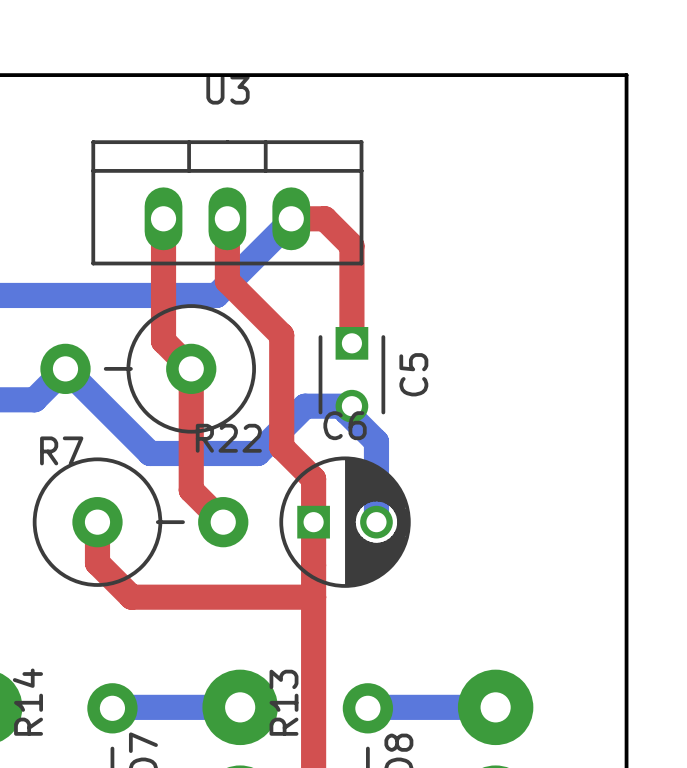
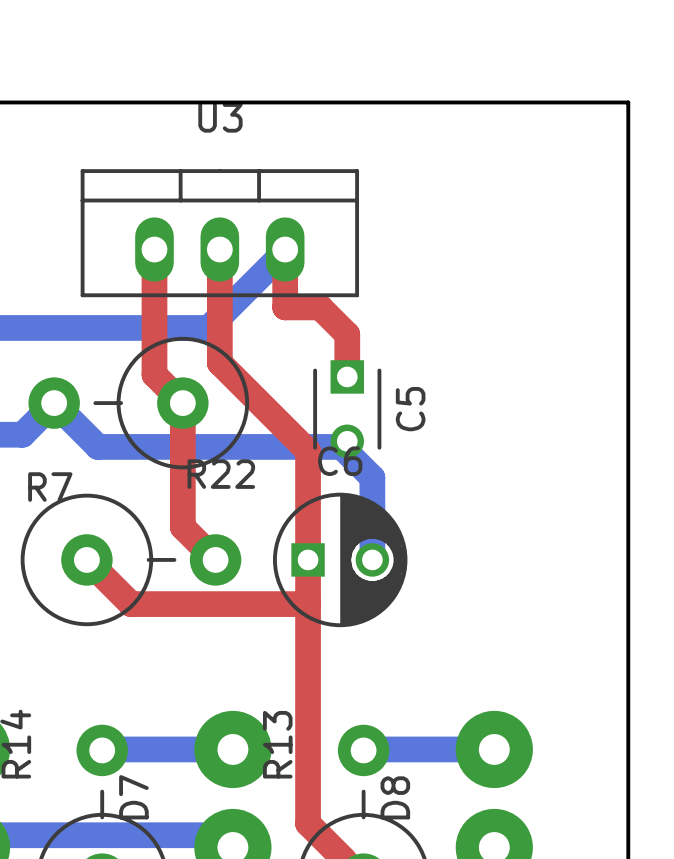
top track: (291, 218) (324, 218) (351, 245) (351, 301) -> (285, 249) (285, 307) (320, 307) (347, 334)
top track: (227, 281) (281, 335) (281, 447) (313, 479) -> (219, 313) (219, 362) (308, 451) (308, 515)
bottom track: (351, 406) (305, 406) (257, 453) (150, 453) (108, 411) -> (341, 446) (98, 446)
top track: (97, 522) (97, 563) (131, 597) (313, 597) -> (86, 559) (131, 604) (308, 604)

